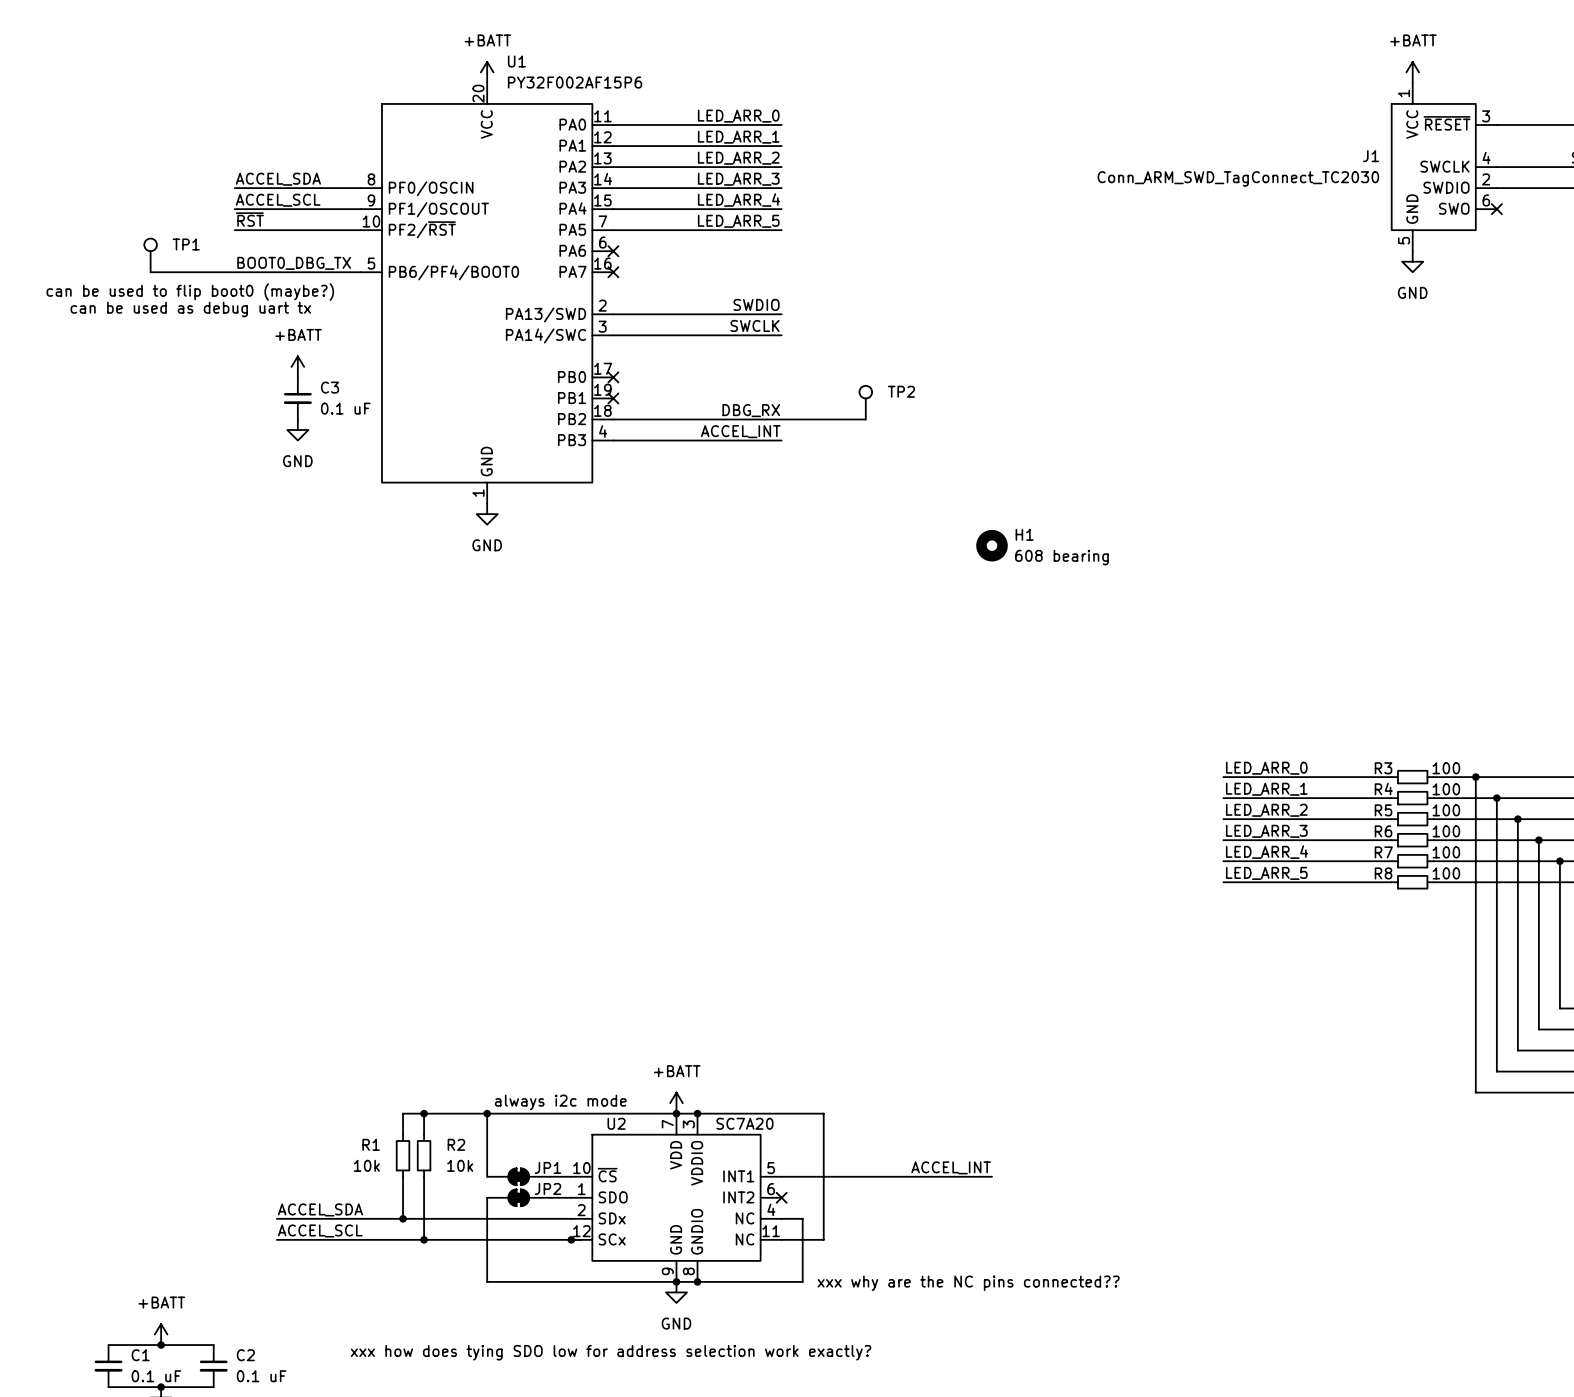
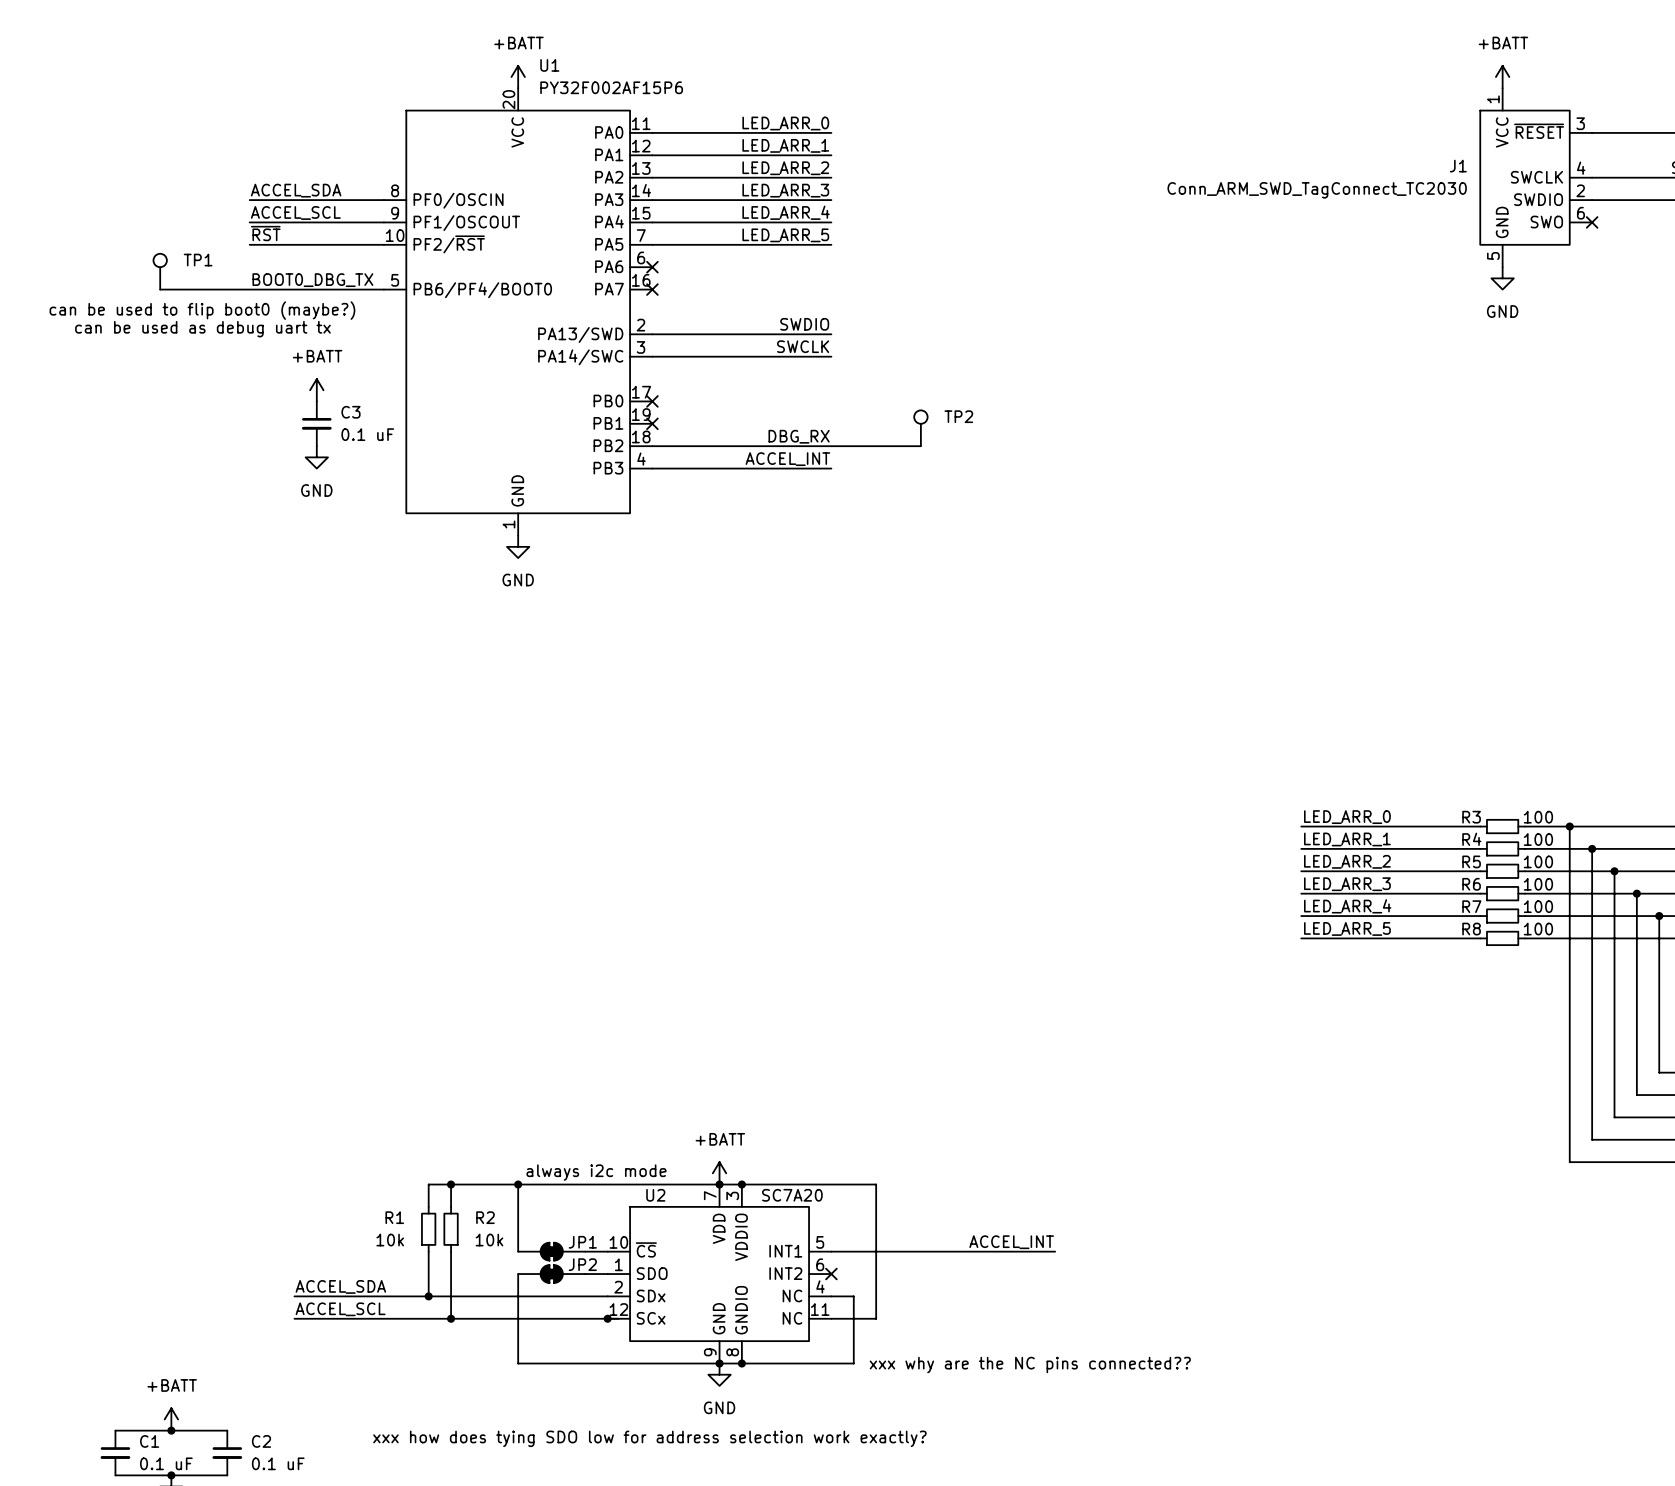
H1: 608 bearing (992, 545) -> none

